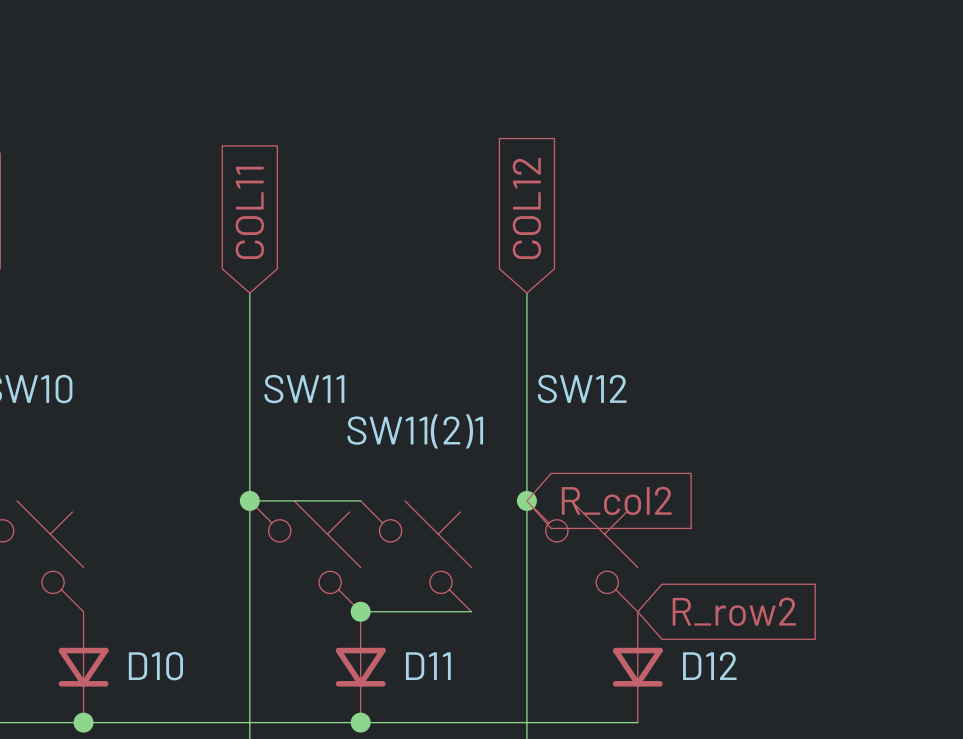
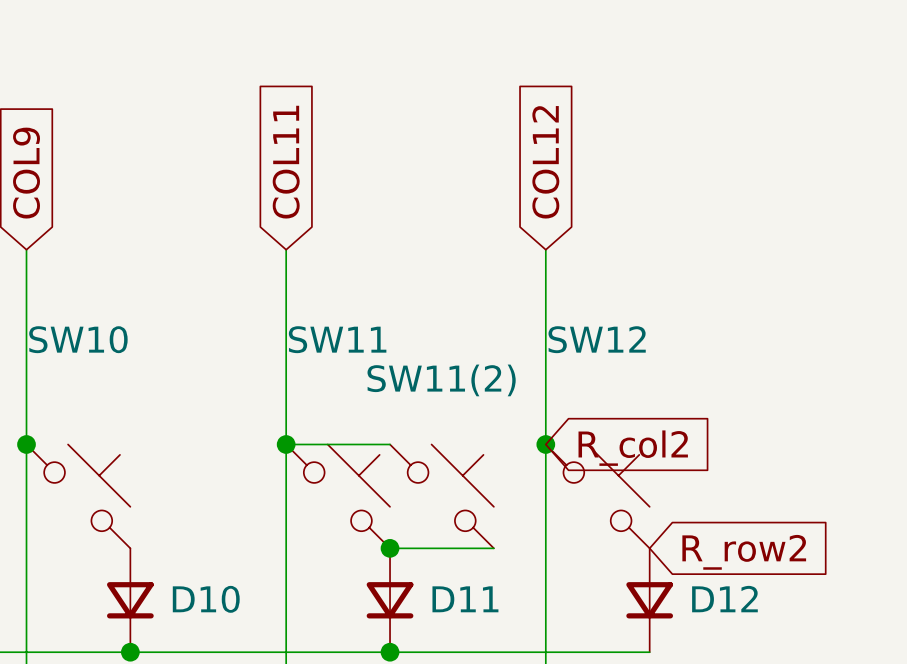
SW11(2)1 name: SW11(2)1 (415, 431) -> SW11(2) (441, 380)

